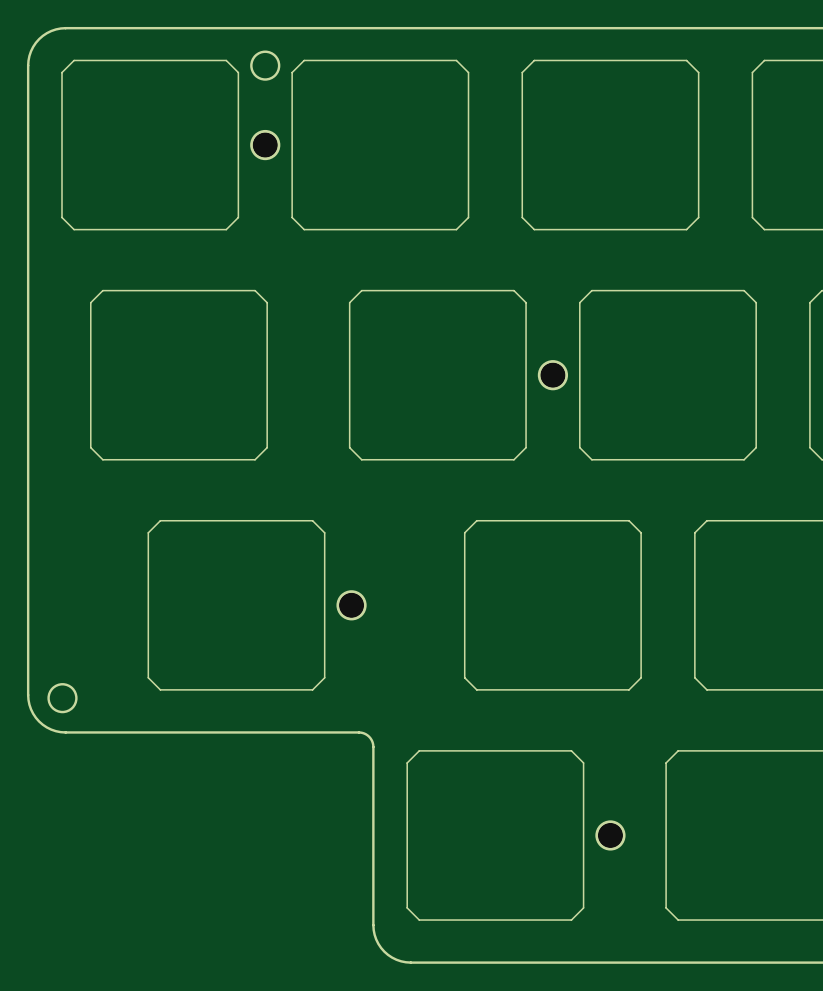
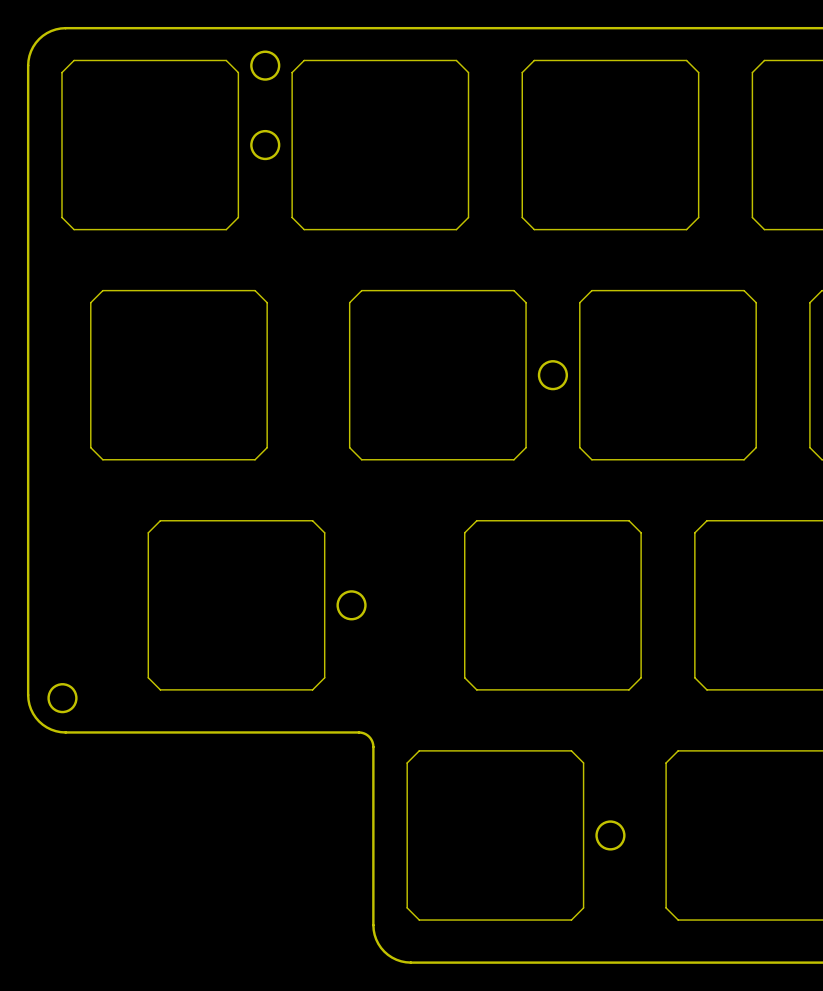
part: (265, 145) -> none
part: (552, 375) -> none
part: (351, 605) -> none
part: (610, 835) -> none

